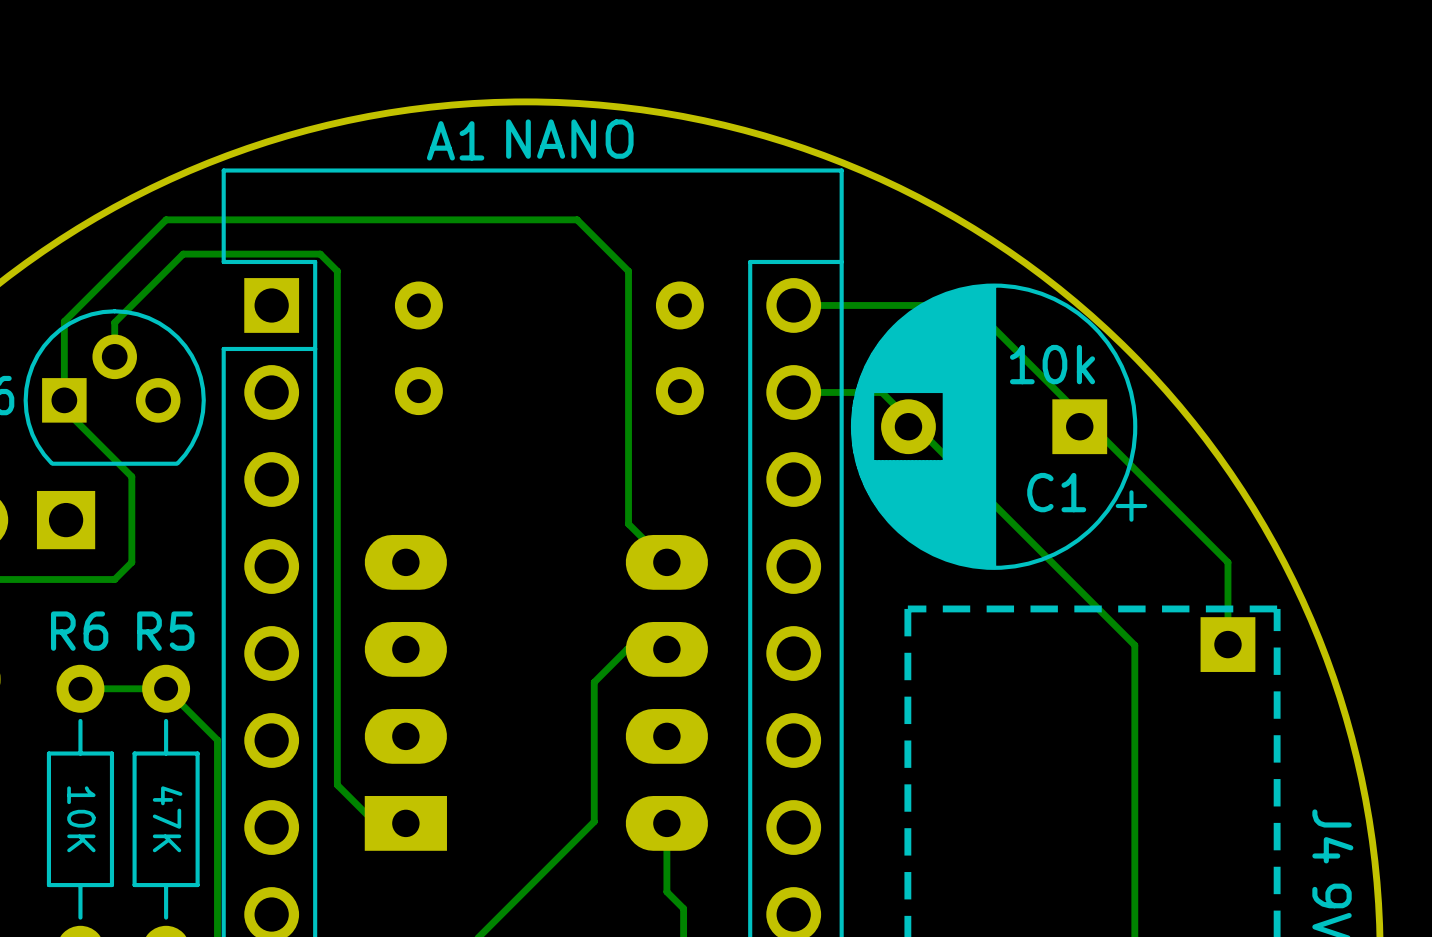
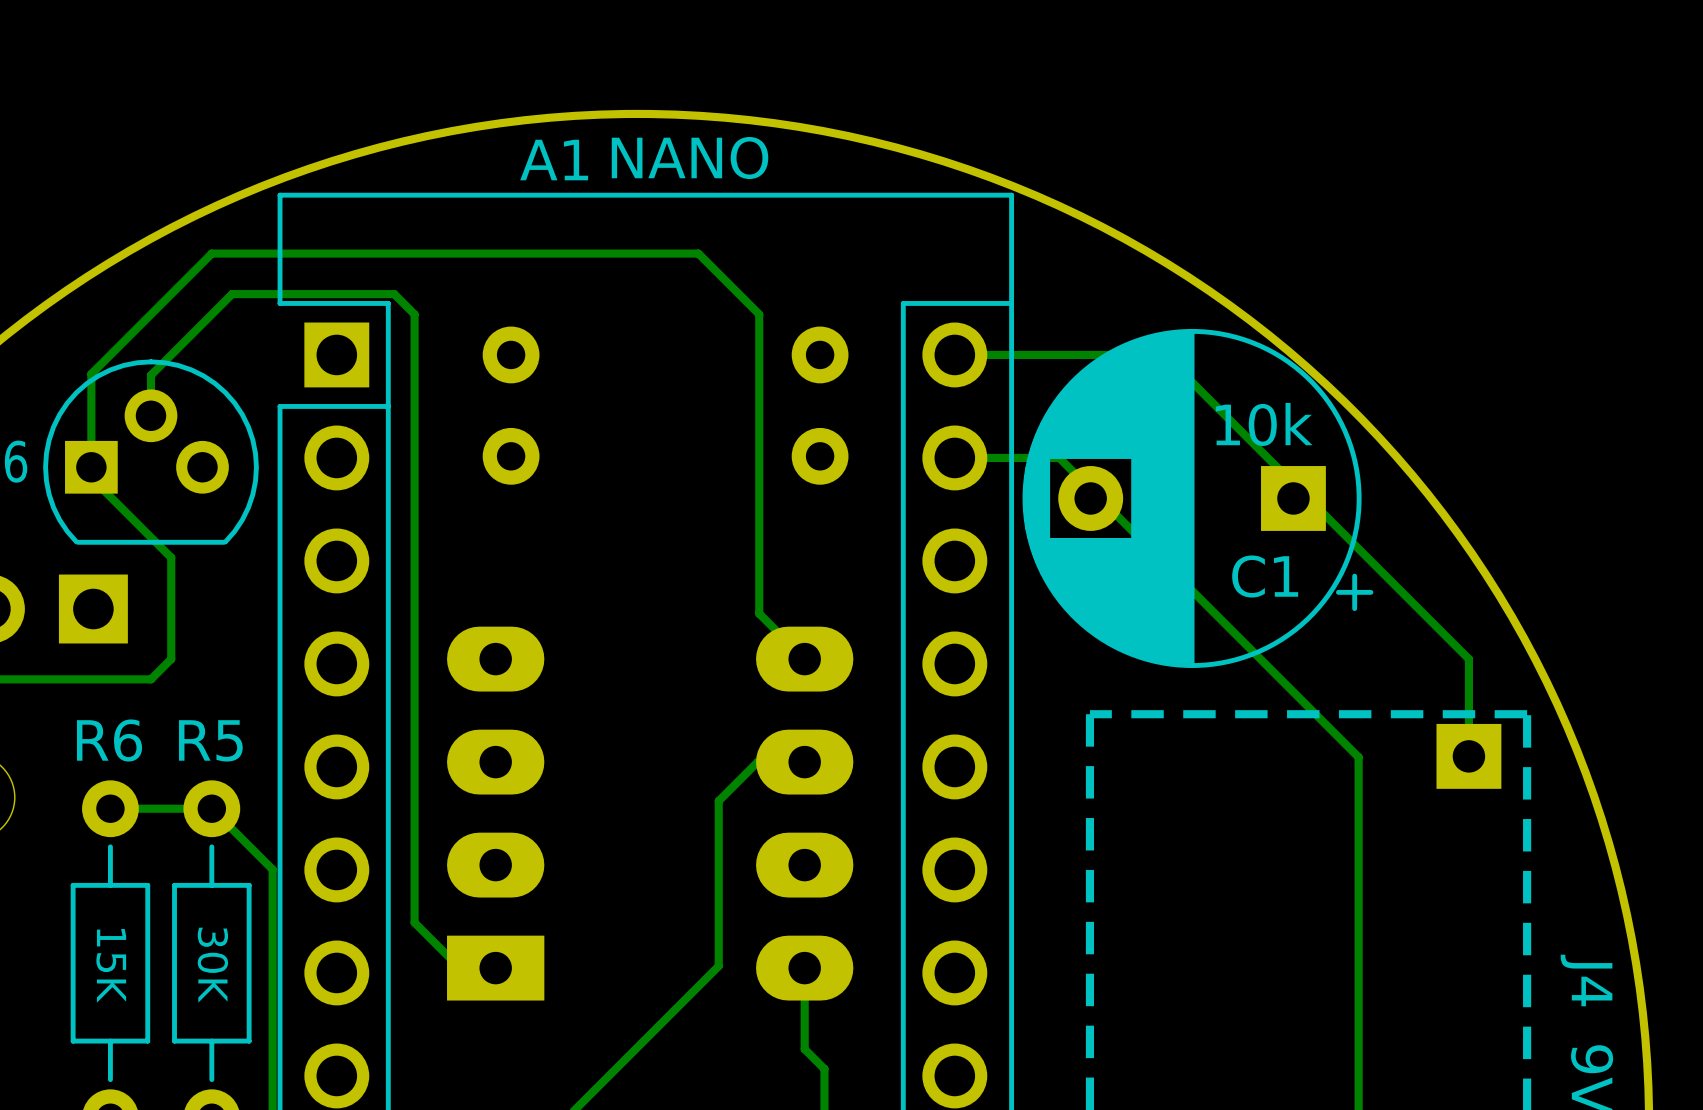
R6 text: 10K (81, 819) -> 15K (111, 965)
R5 text: 47K (167, 819) -> 30K (212, 965)

